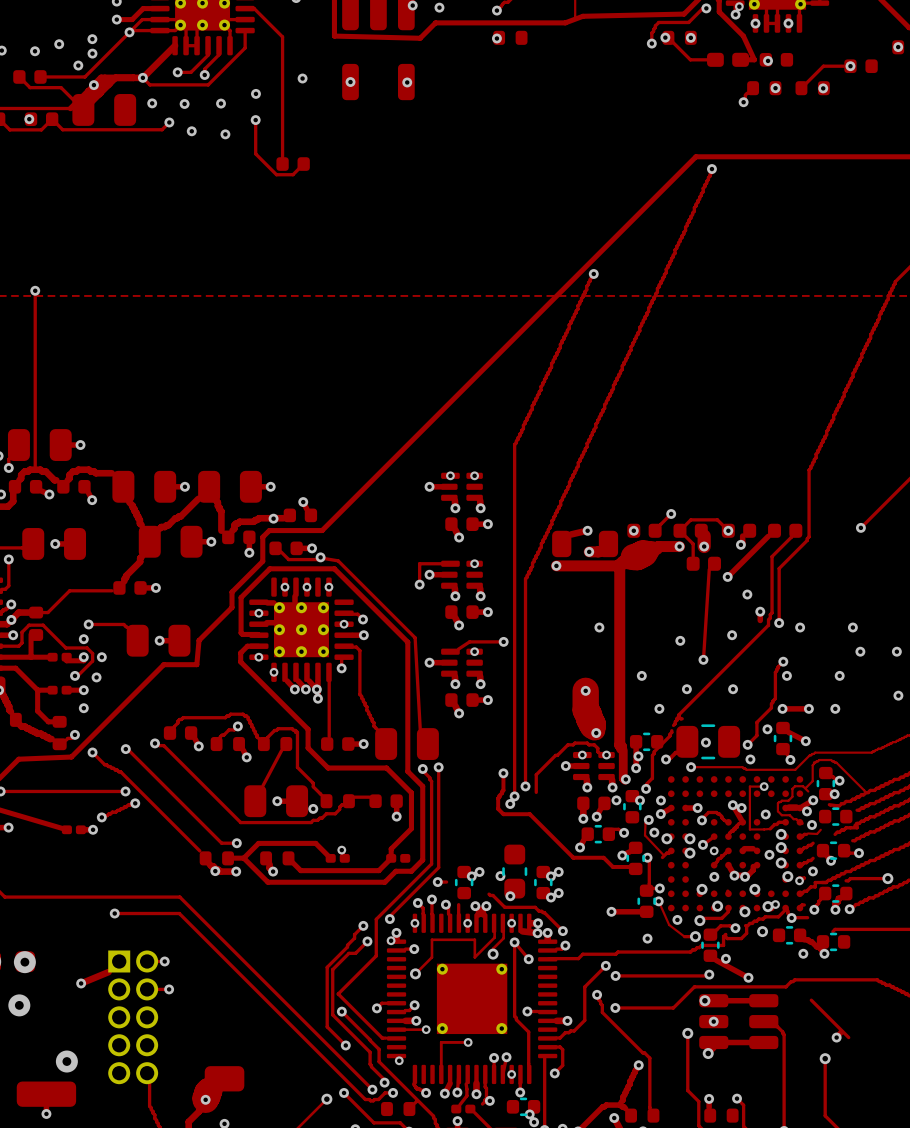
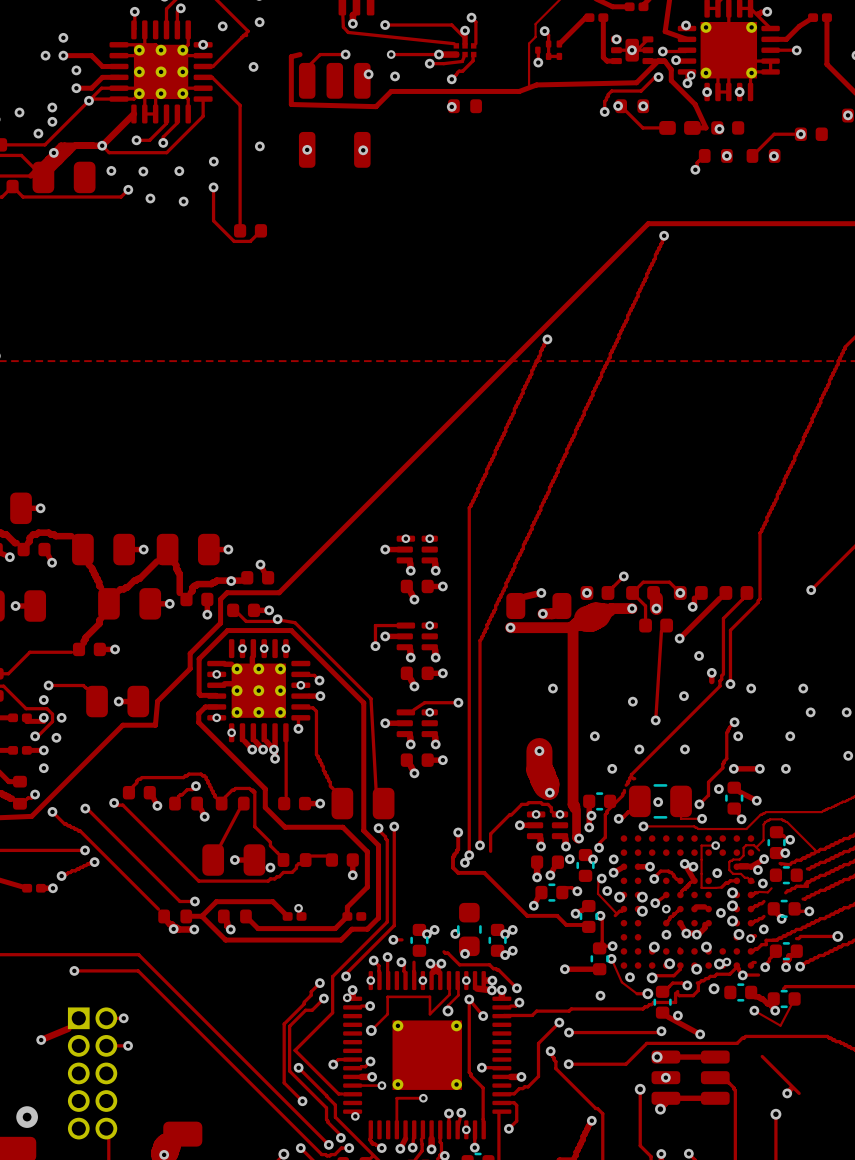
track: none -> (681, 801) (681, 818) (702, 818)
track: none -> (794, 998) (780, 1025) (754, 1010)

